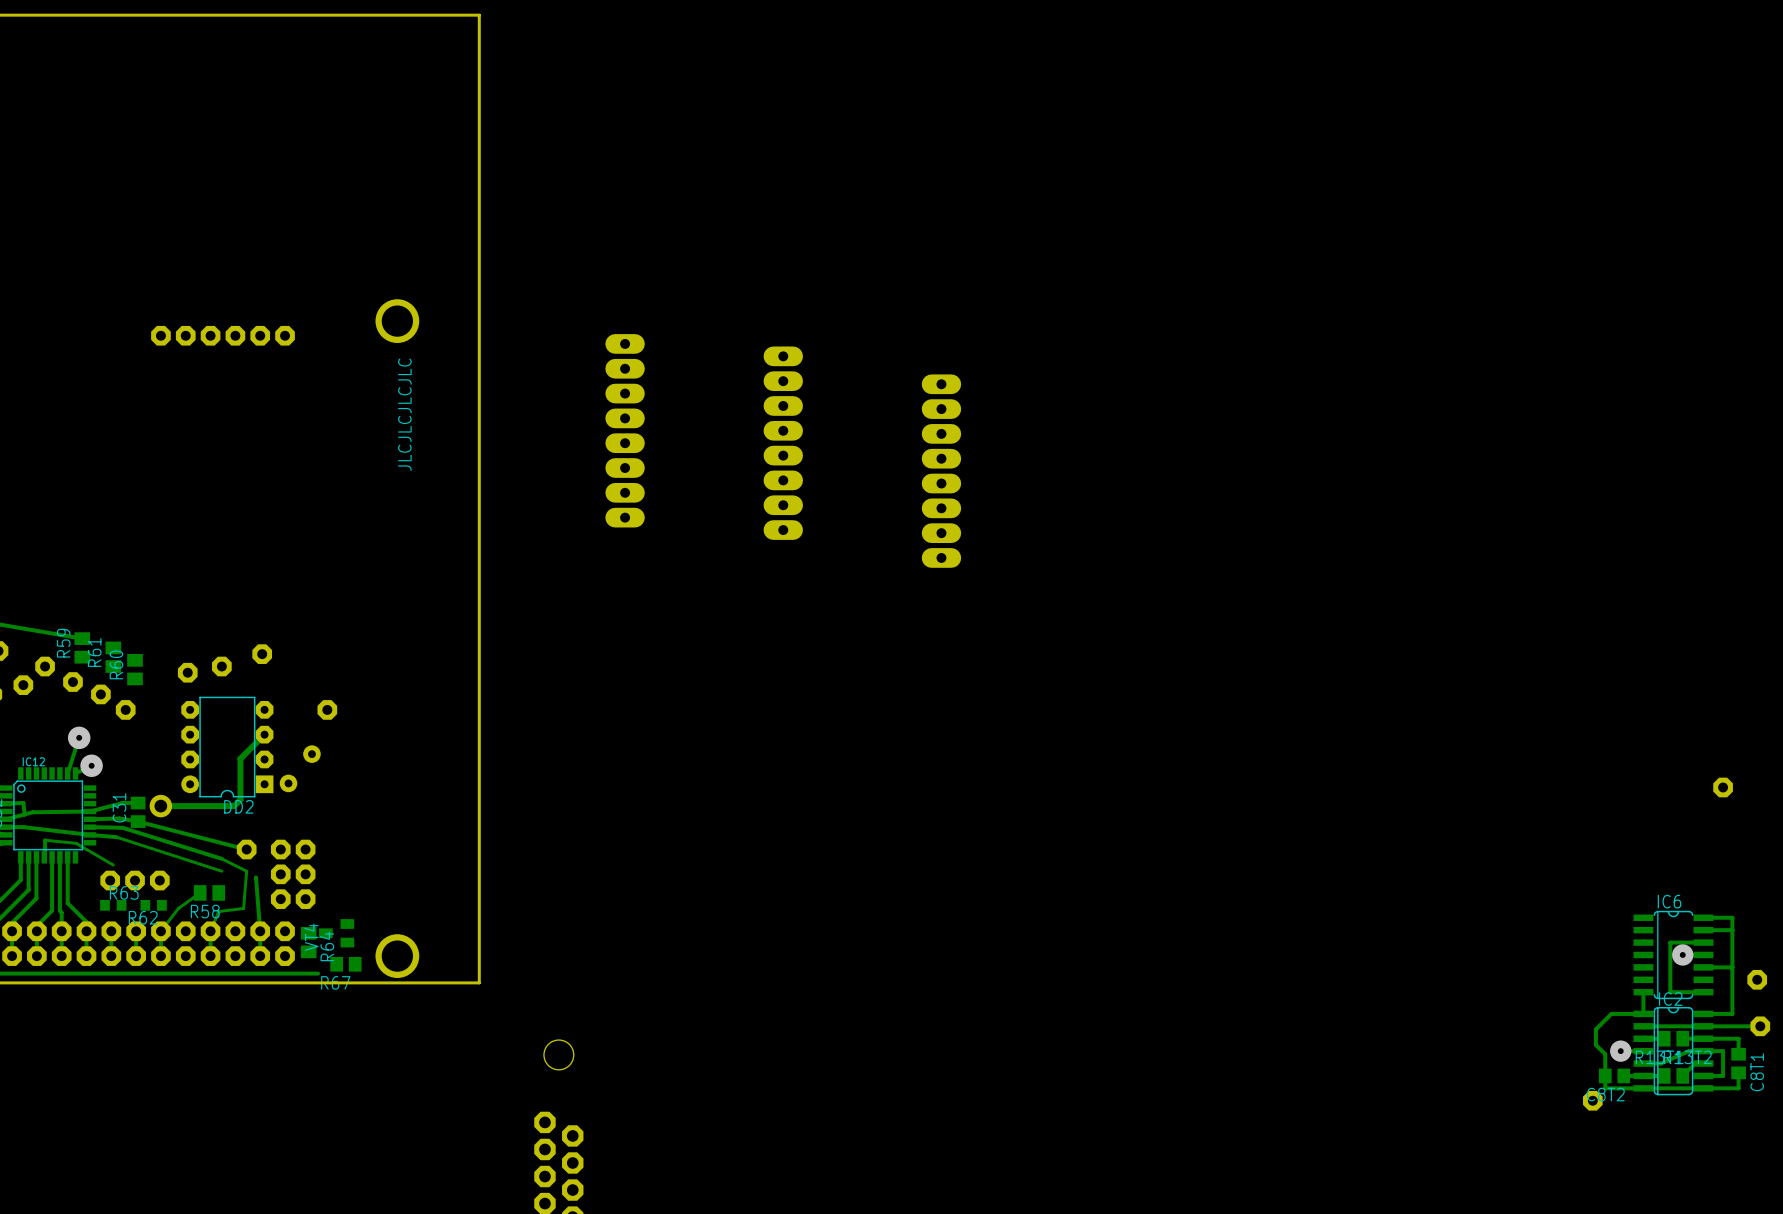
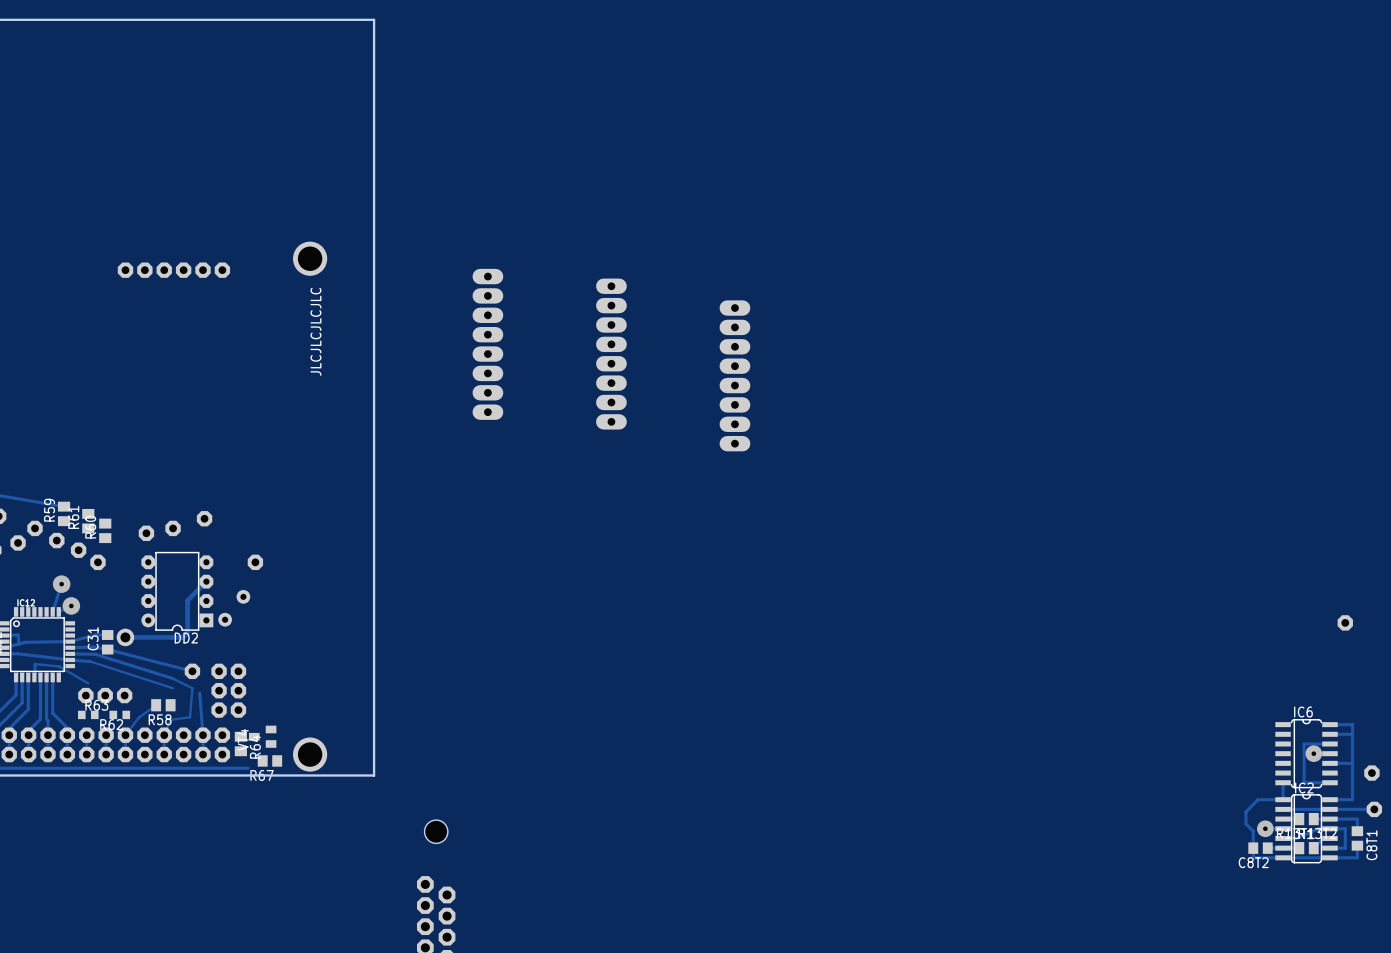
part: (1592, 1100) -> none

